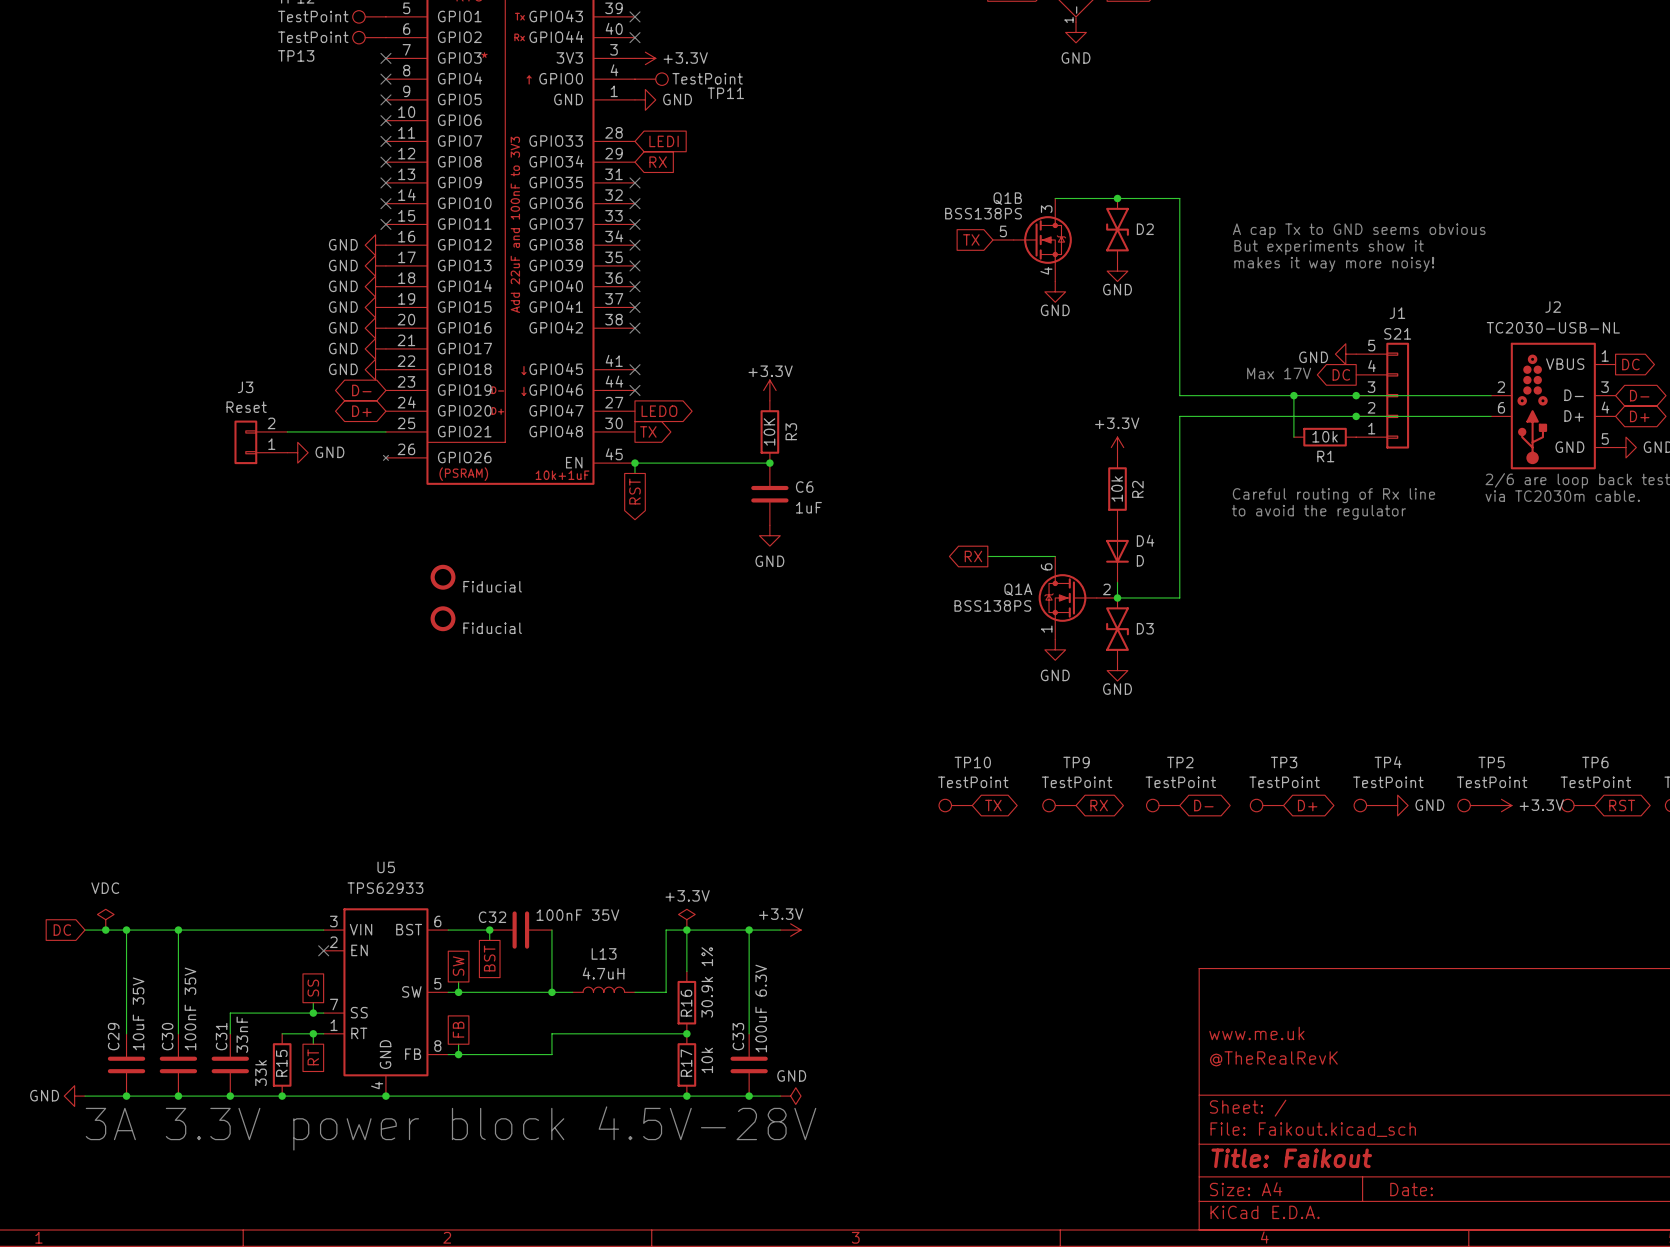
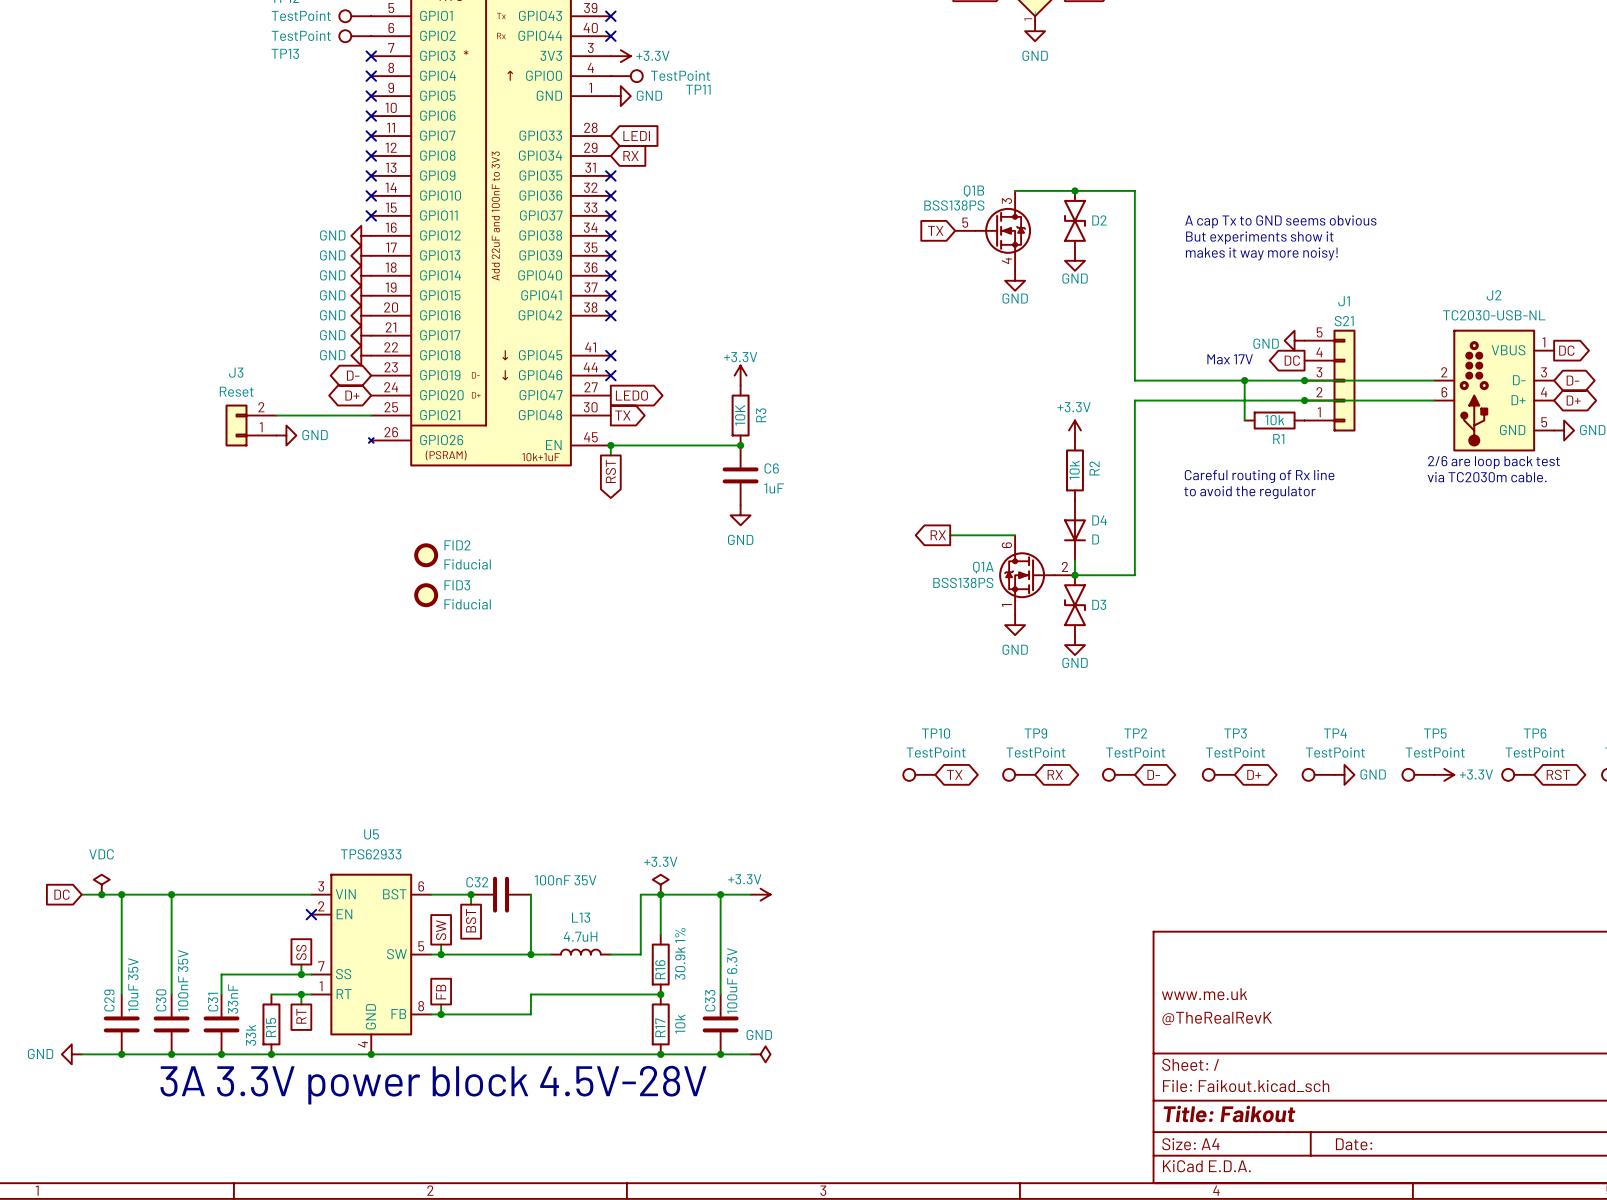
FID2 name: none -> FID2 (457, 545)
FID3 name: none -> FID3 (457, 585)

